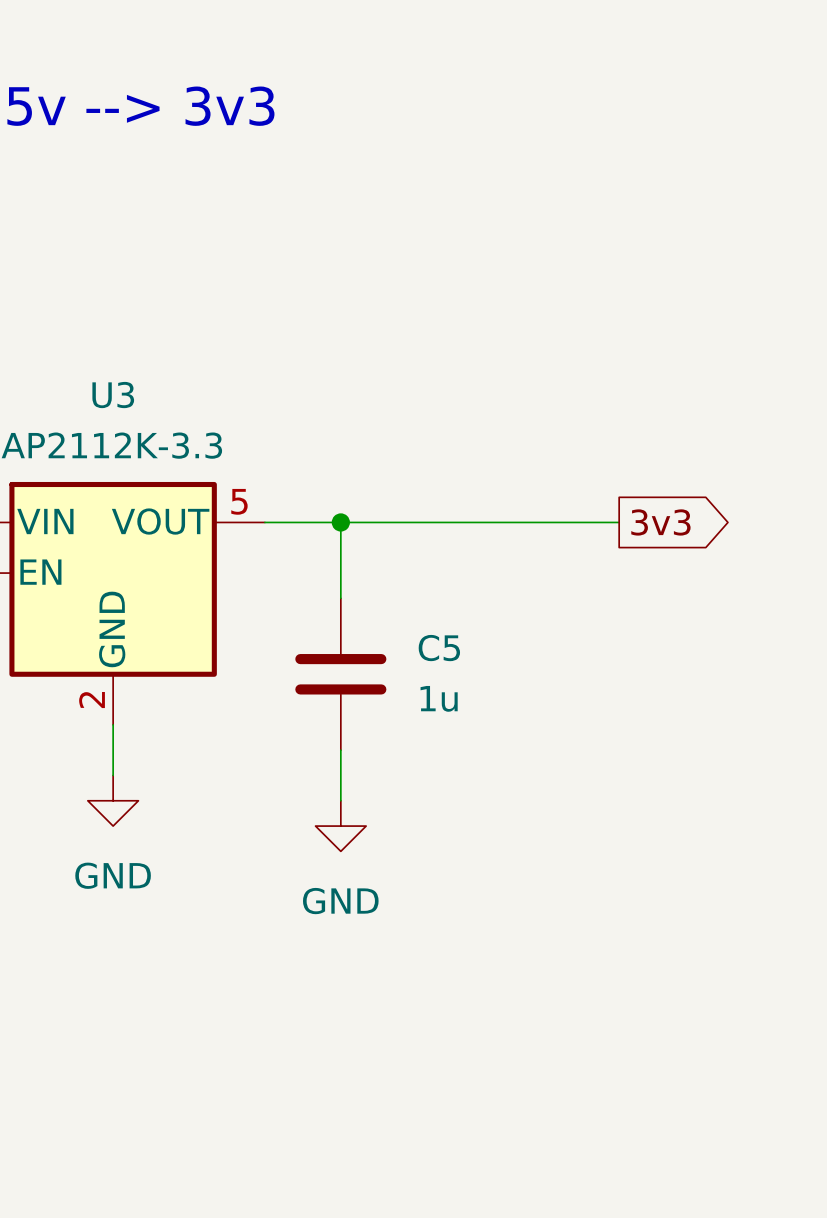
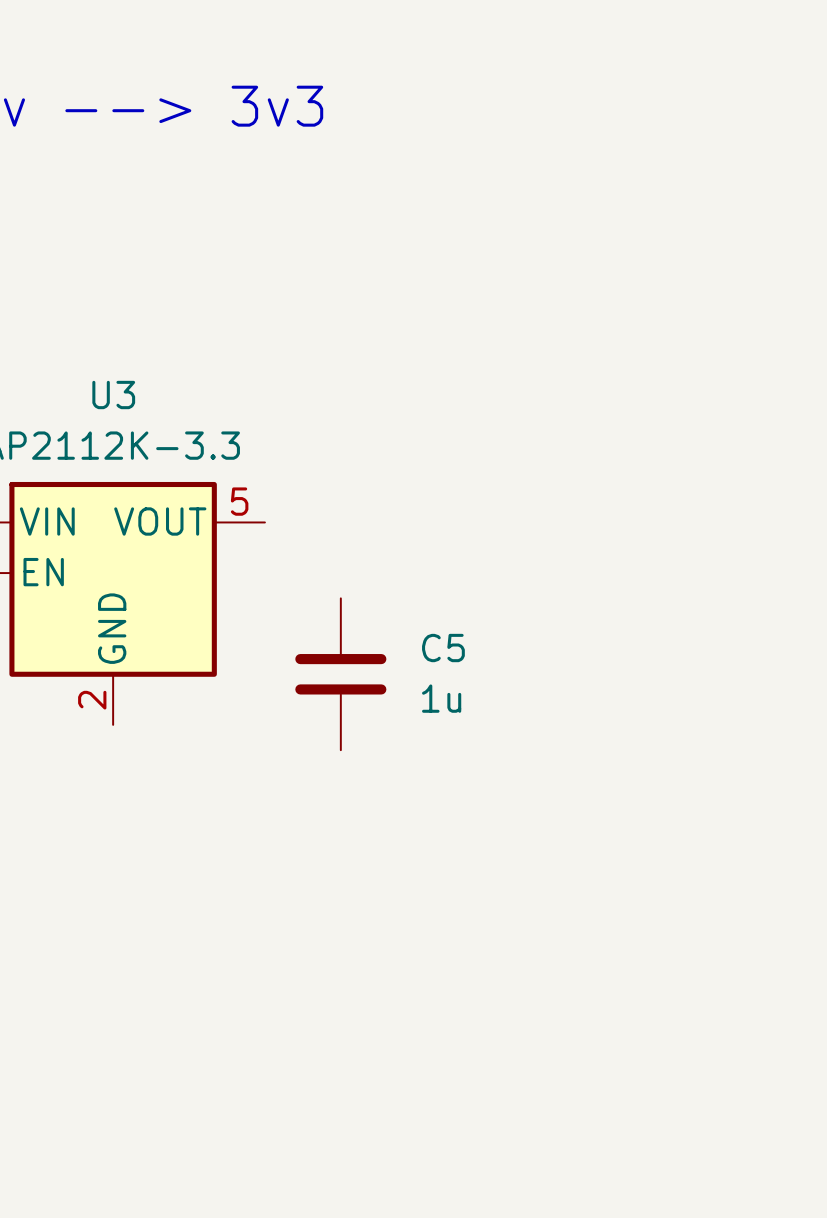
wire: (264, 522) (619, 522) -> none
wire: (340, 522) (340, 598) -> none
junction: (340, 522) -> none
global label: 3v3 (660, 522) -> none
wire: (113, 724) (113, 775) -> none
wire: (340, 750) (340, 800) -> none
power symbol: GND (113, 800) -> none
power symbol: GND (340, 826) -> none

